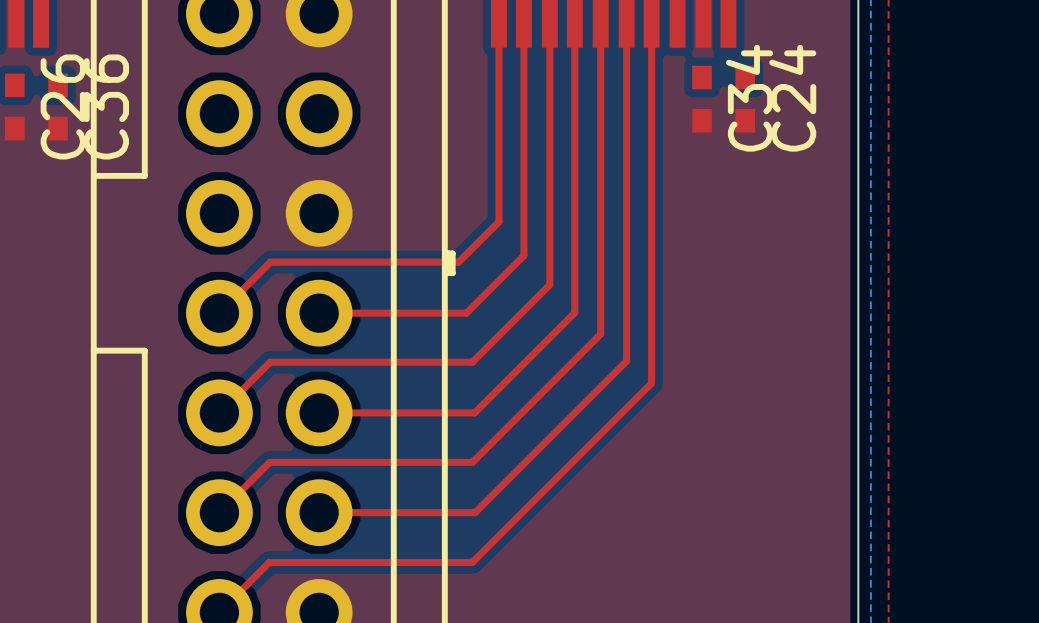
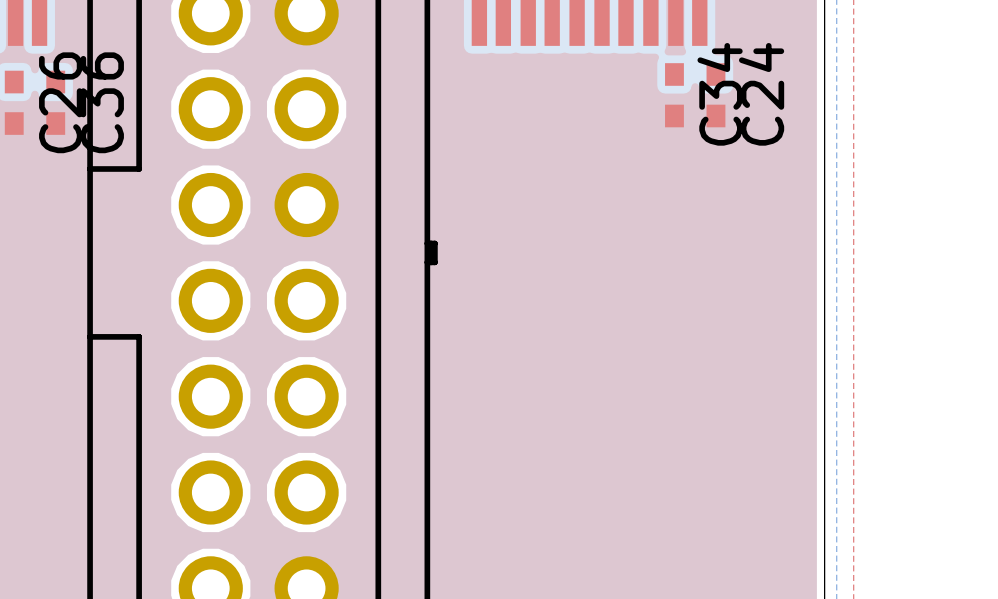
top track: (498, 22) (498, 221) (458, 262) (270, 262) (219, 313) -> none
top track: (523, 22) (523, 255) (466, 313) (319, 313) -> none
top track: (549, 22) (549, 284) (472, 362) (270, 362) (219, 412) -> none
top track: (574, 22) (574, 312) (474, 412) (319, 412) -> none
top track: (600, 22) (600, 333) (472, 462) (269, 462) (219, 512) -> none
top track: (626, 22) (626, 361) (475, 512) (319, 512) -> none
top track: (651, 22) (651, 383) (472, 562) (269, 562) (219, 612) -> none

